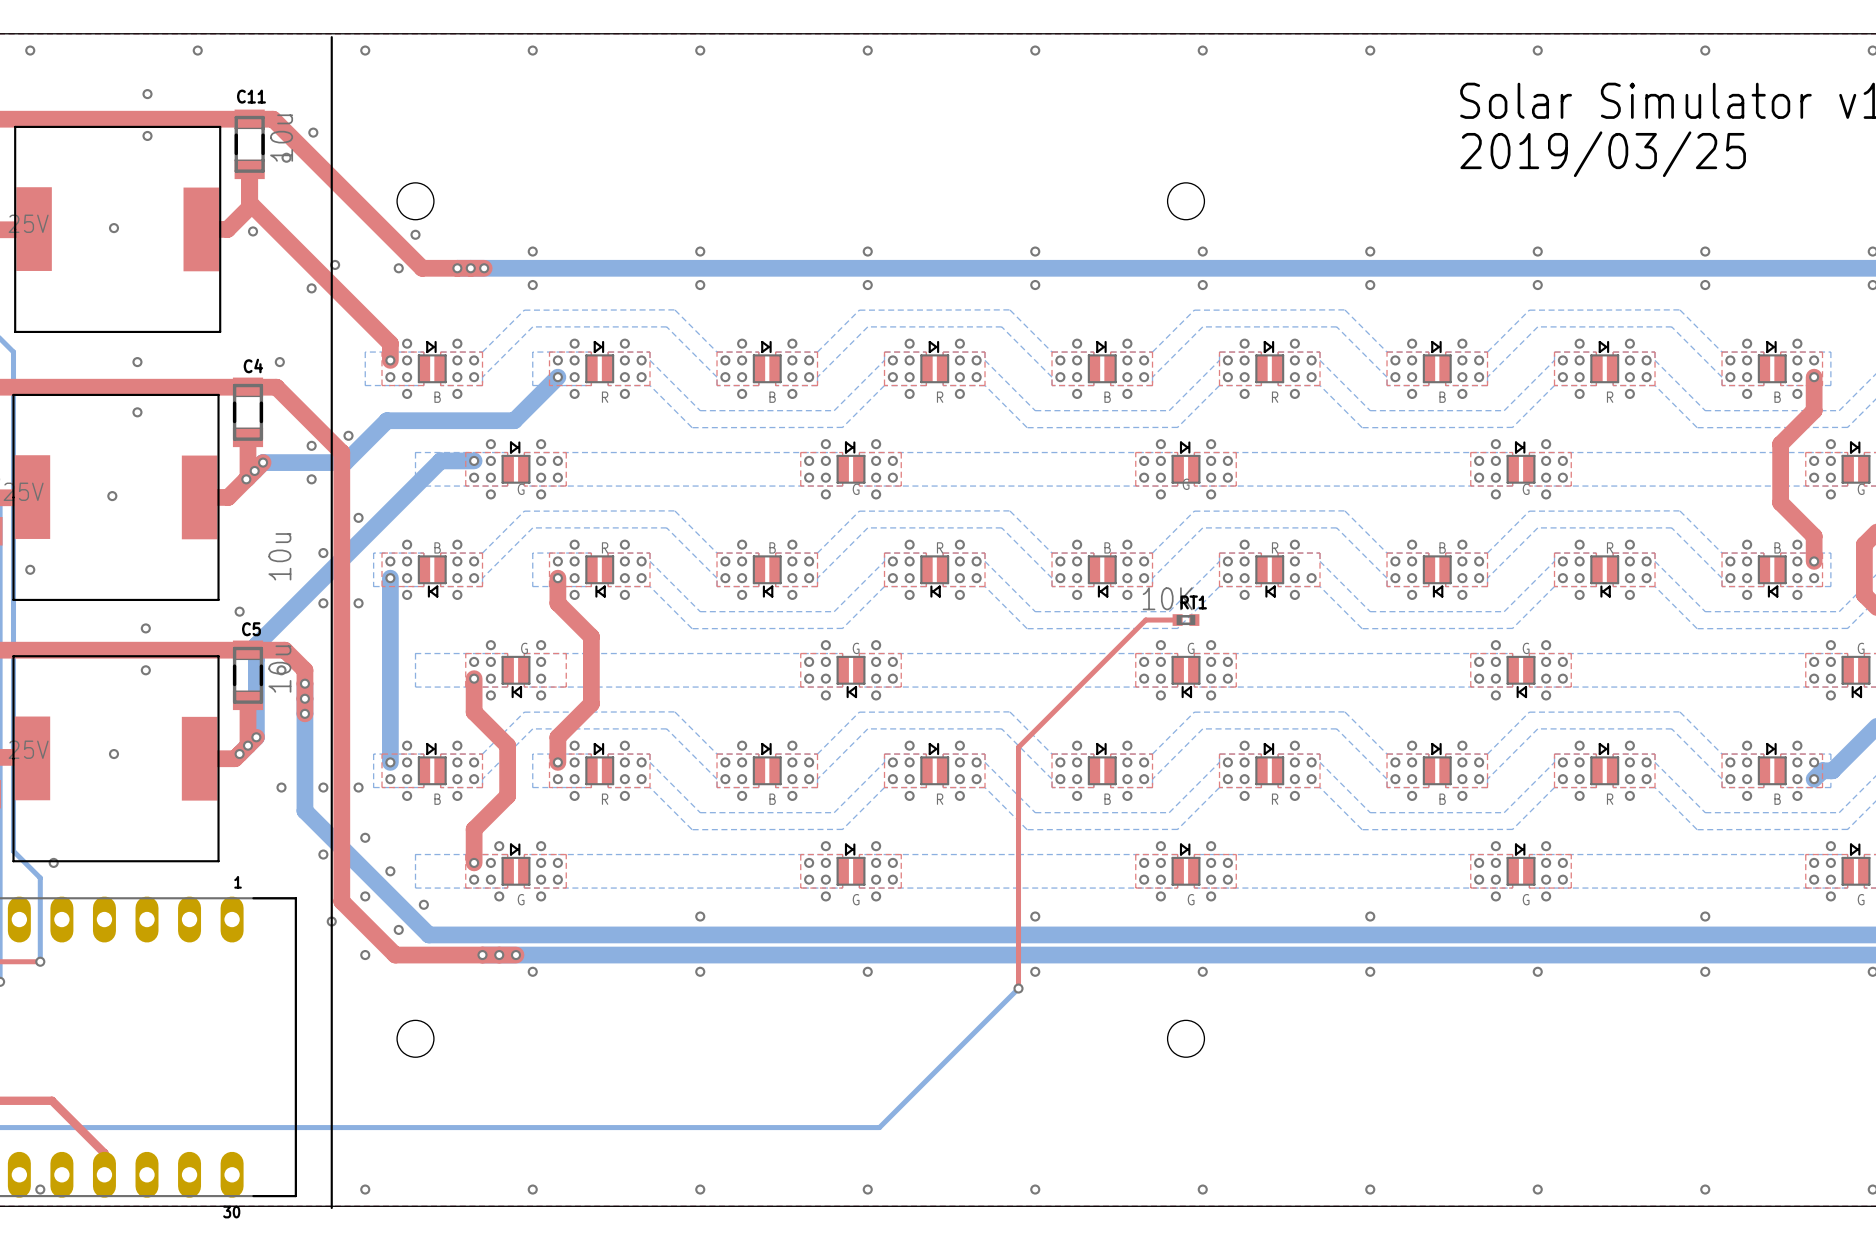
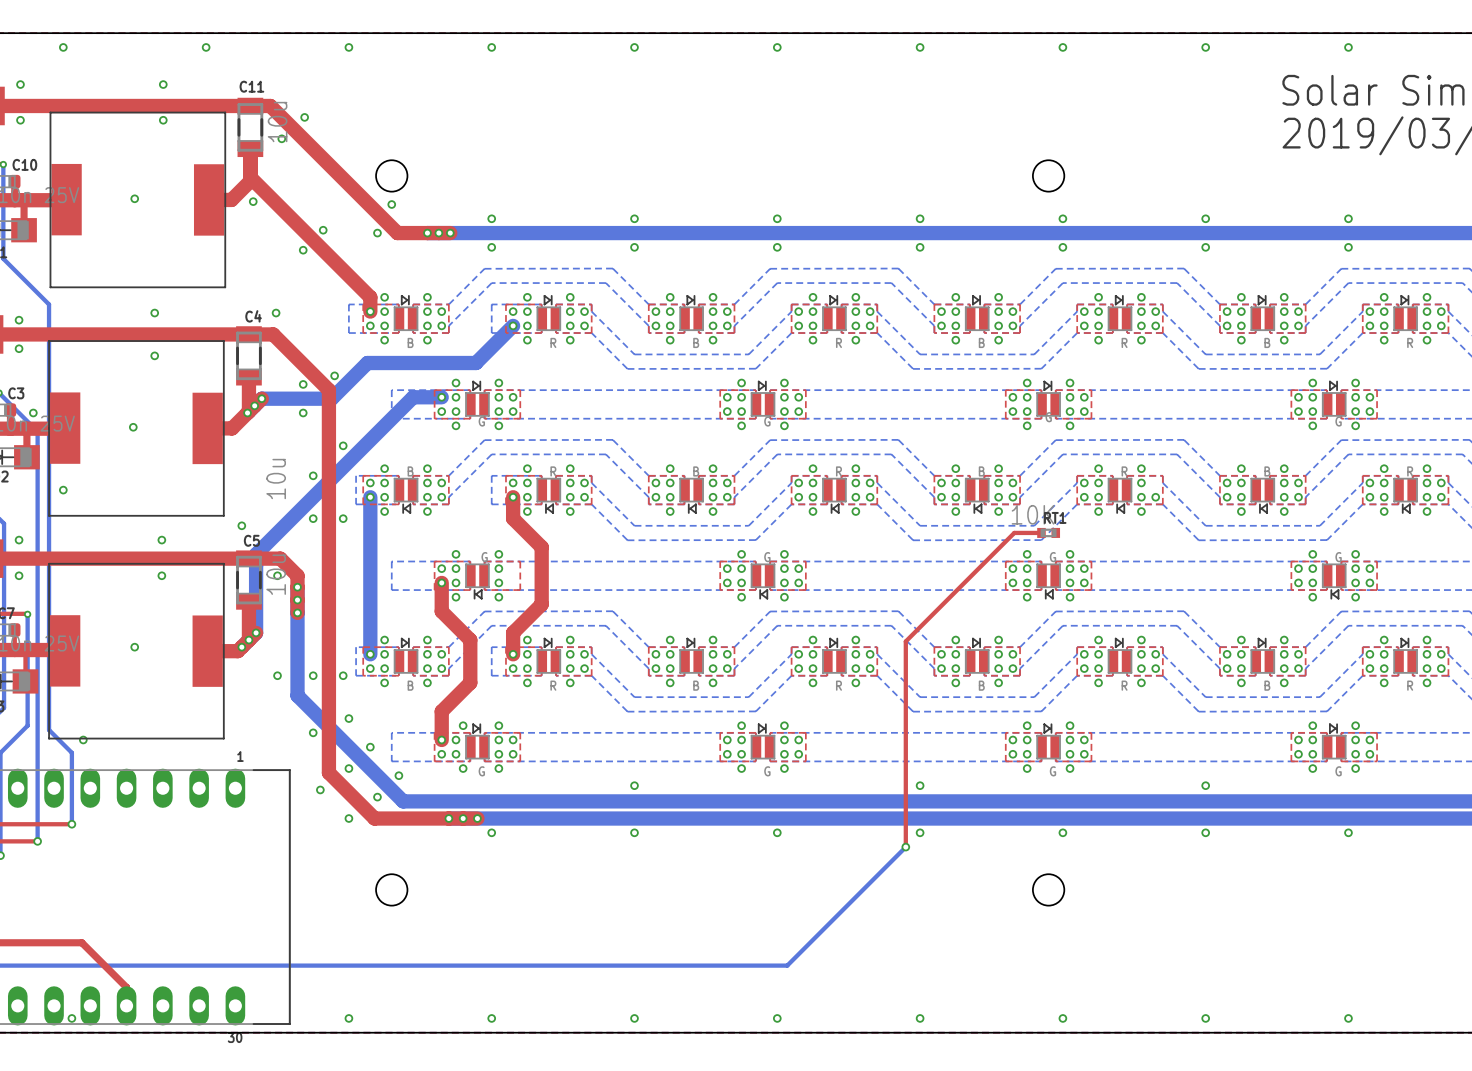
line: (331, 37) (331, 1207) -> none

